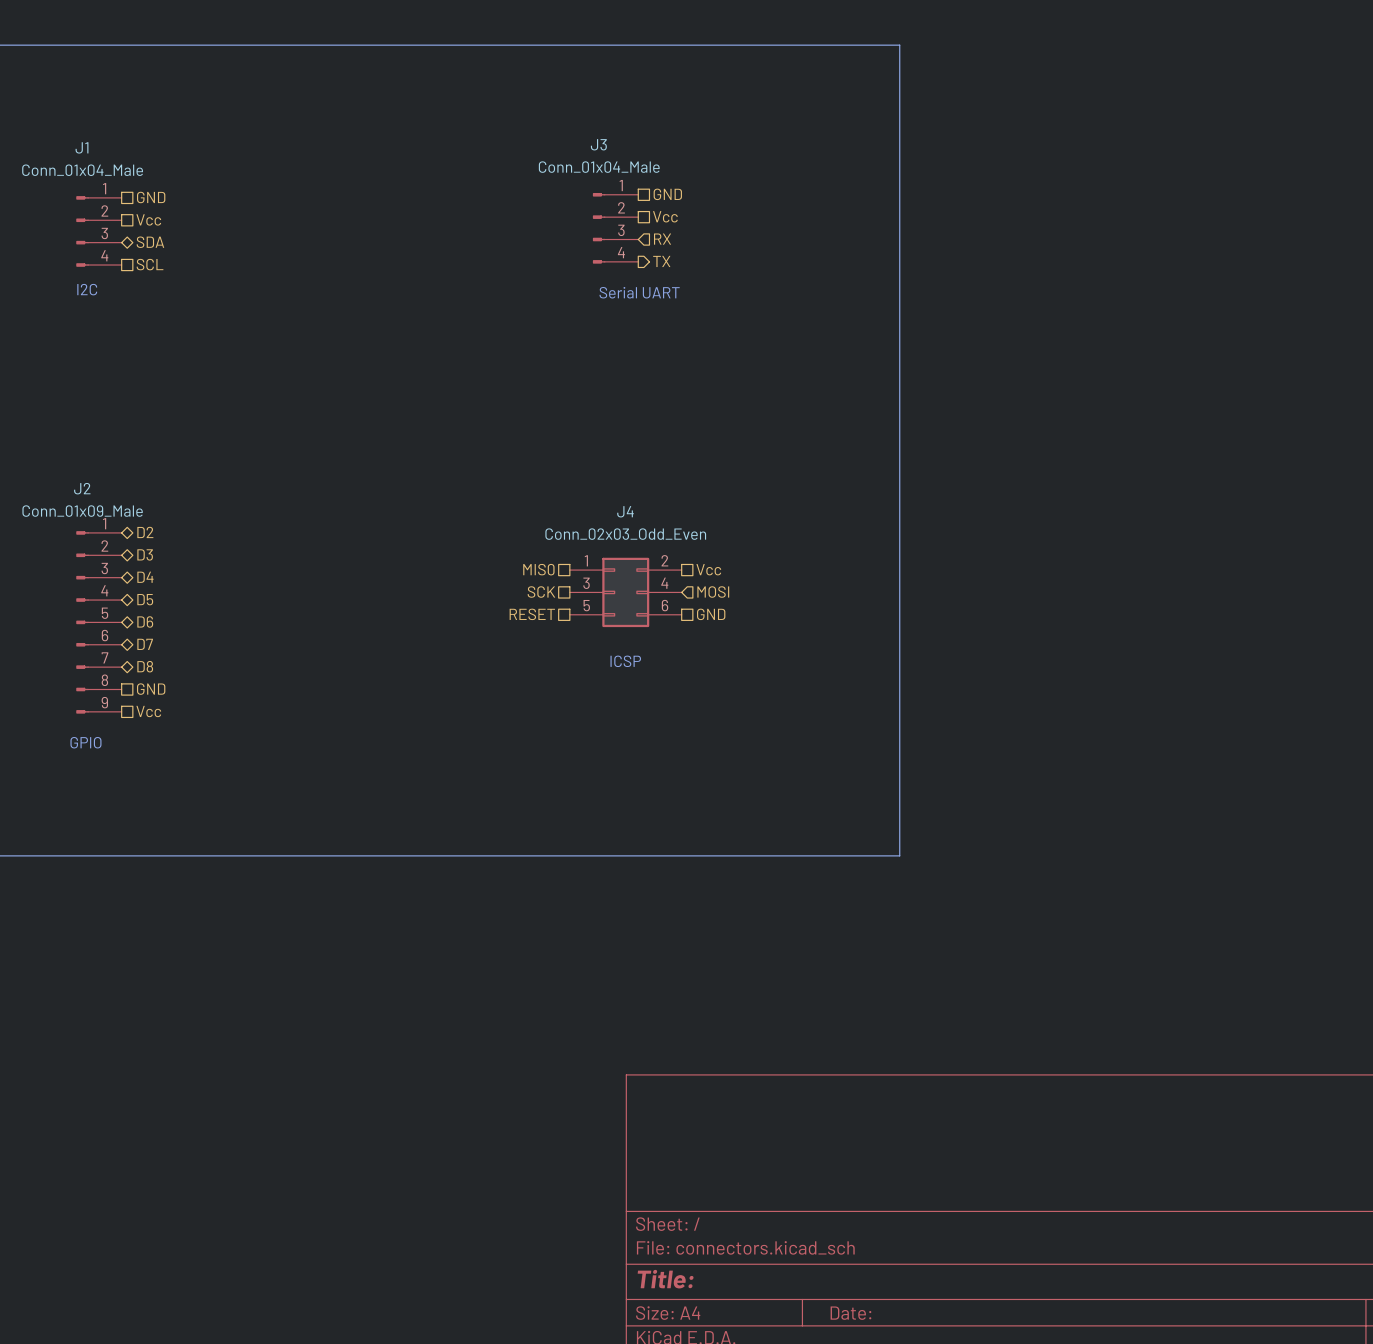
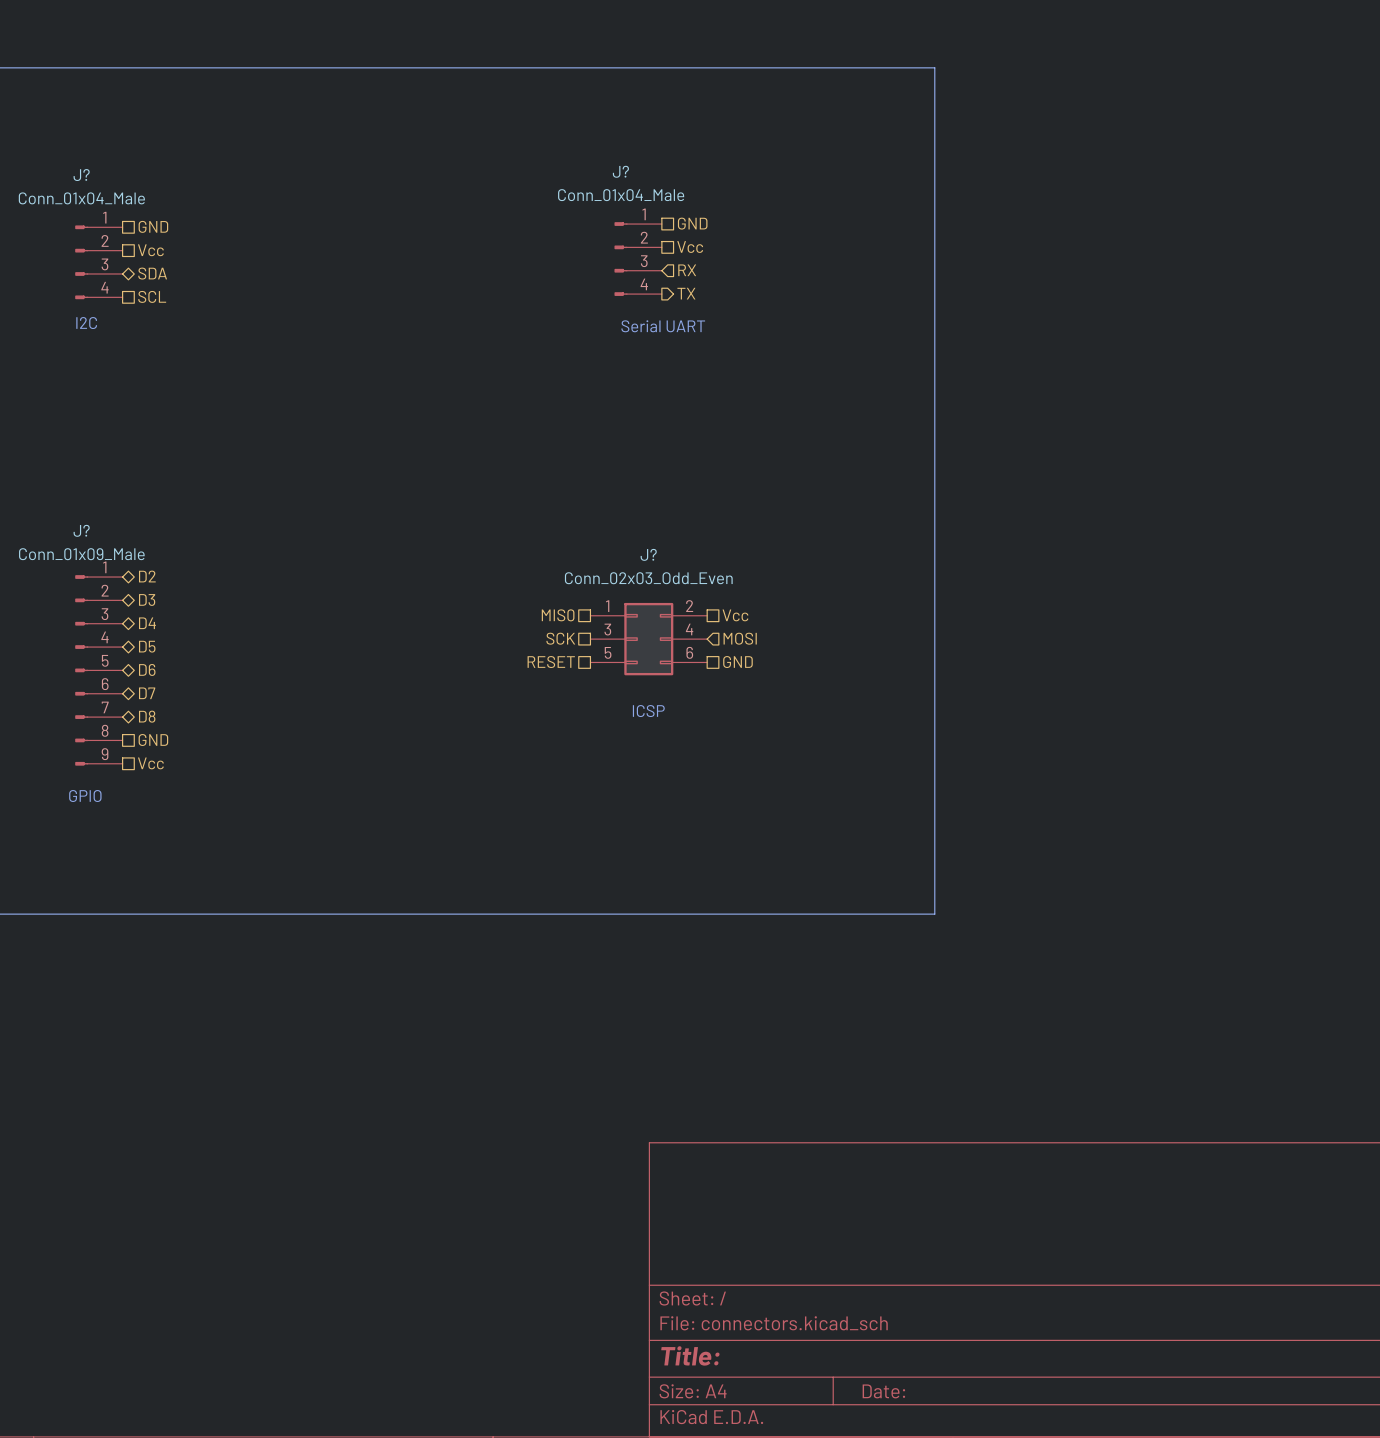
J3 name: J3 (598, 144) -> J? (620, 171)
J1 name: J1 (82, 147) -> J? (81, 175)
J2 name: J2 (82, 488) -> J? (81, 530)
J4 name: J4 (625, 511) -> J? (648, 554)

